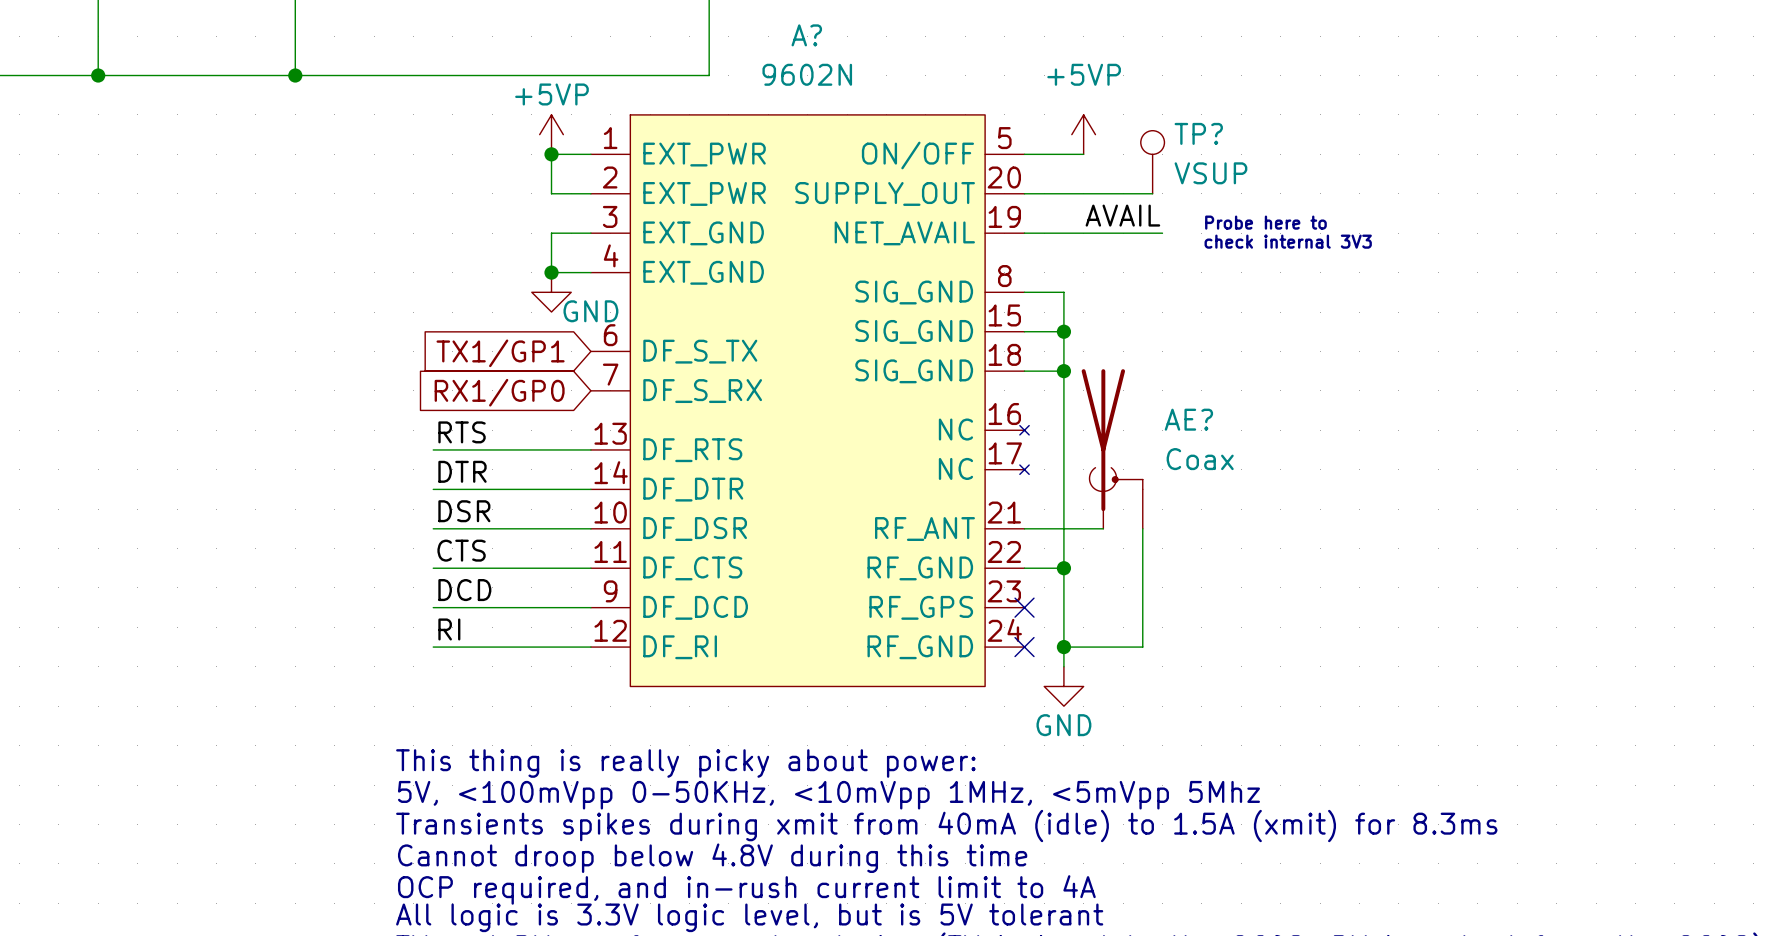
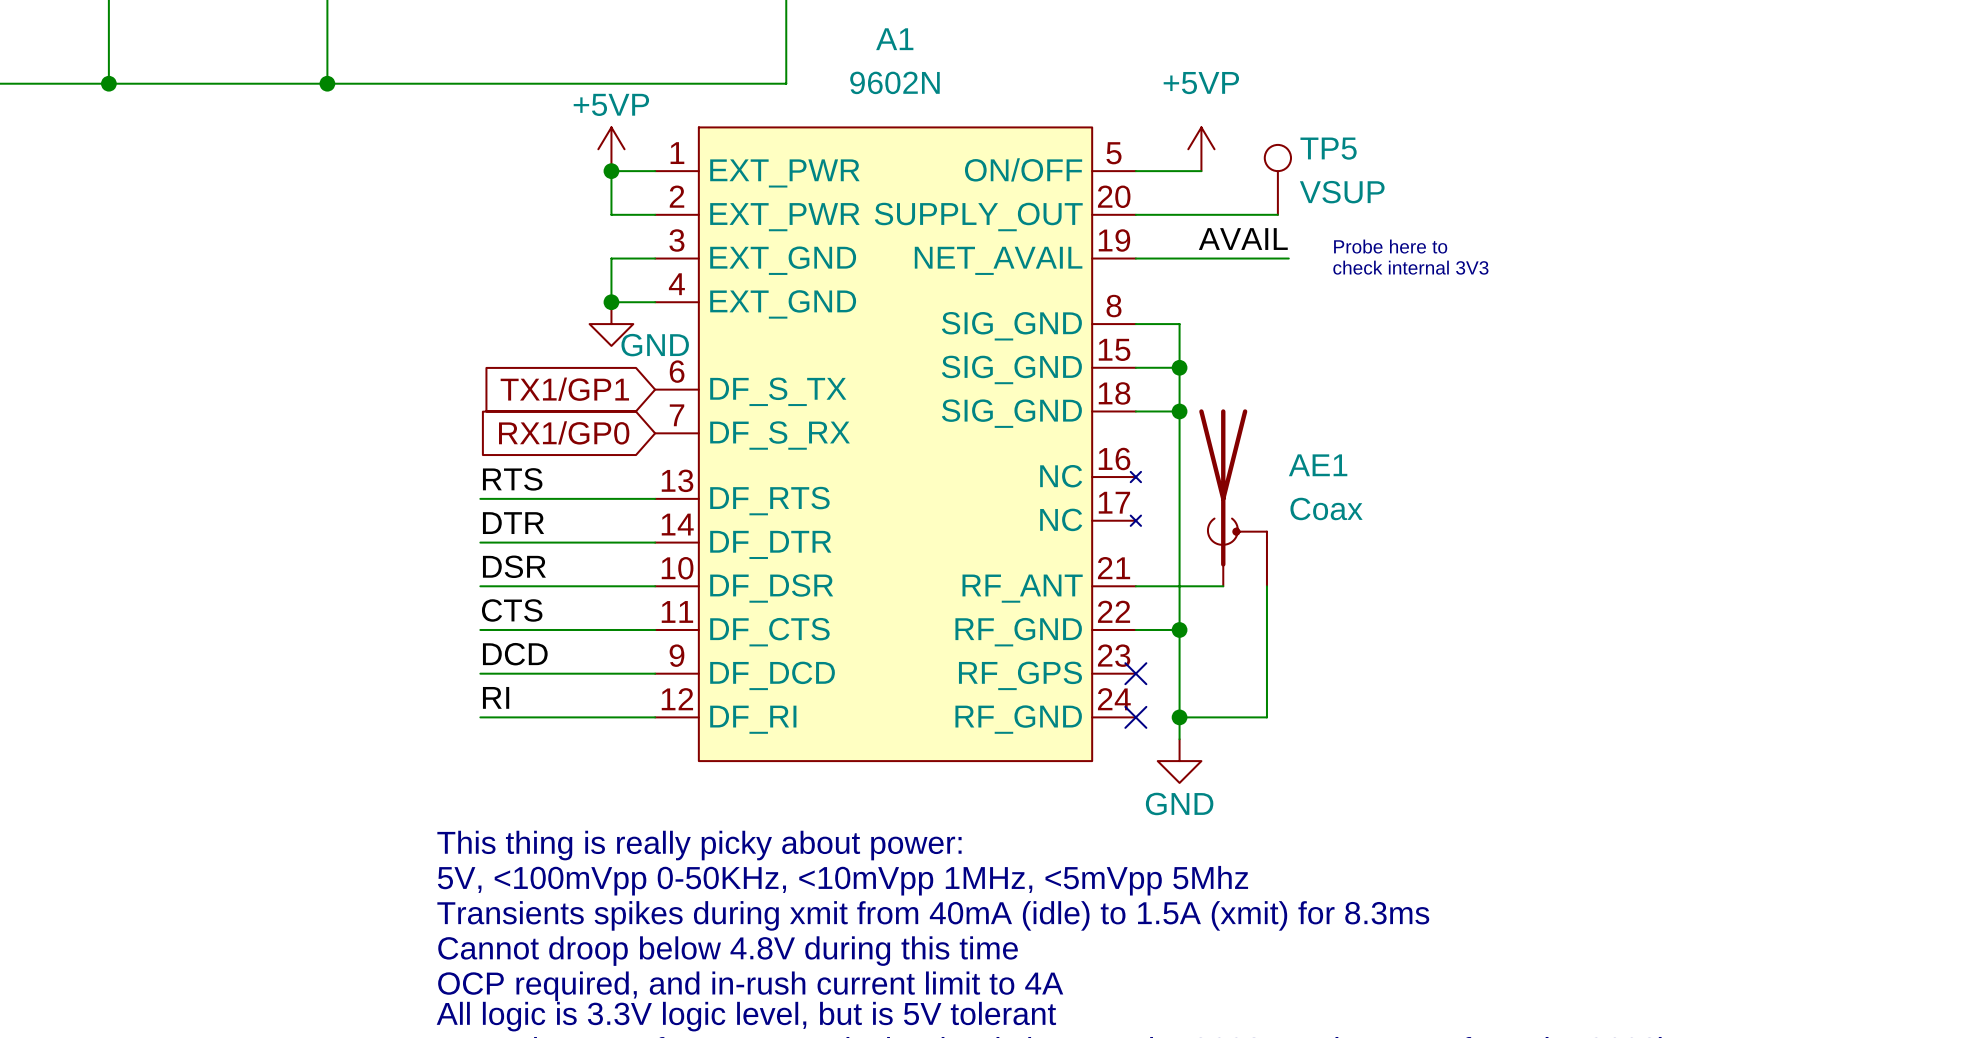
A? name: A? (806, 35) -> A1 (894, 39)
TP? name: TP? (1198, 133) -> TP5 (1328, 148)
AE? name: AE? (1188, 419) -> AE1 (1318, 465)

